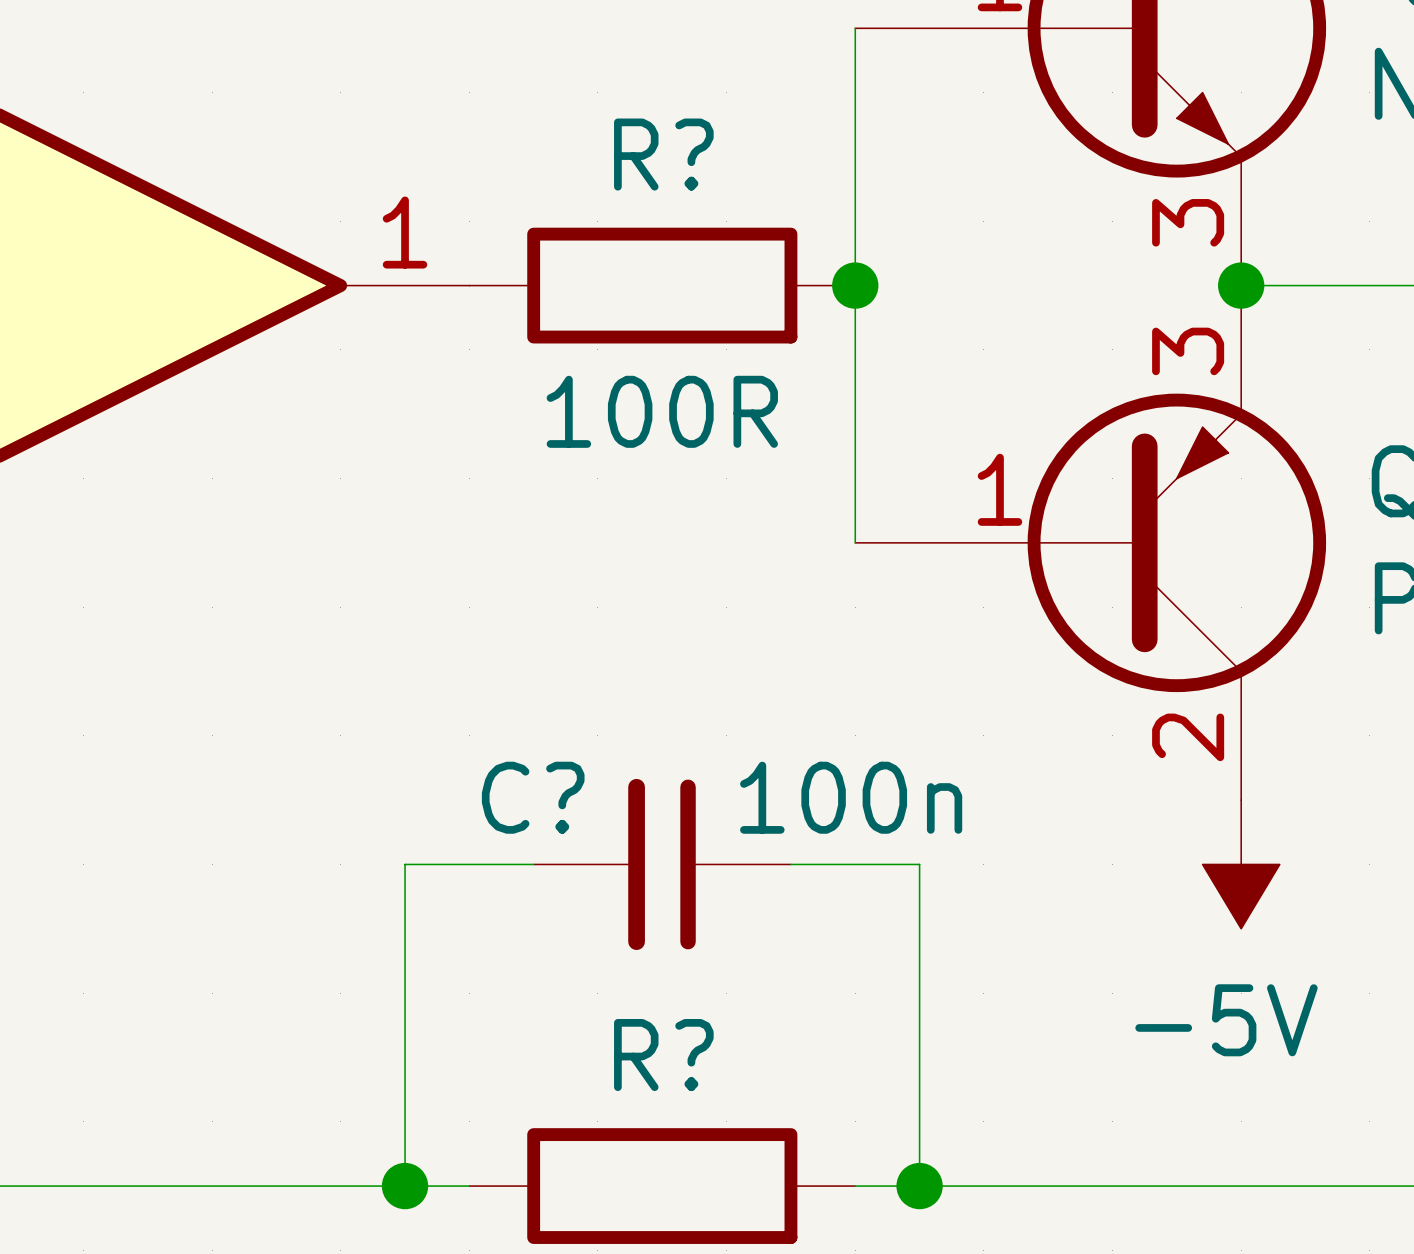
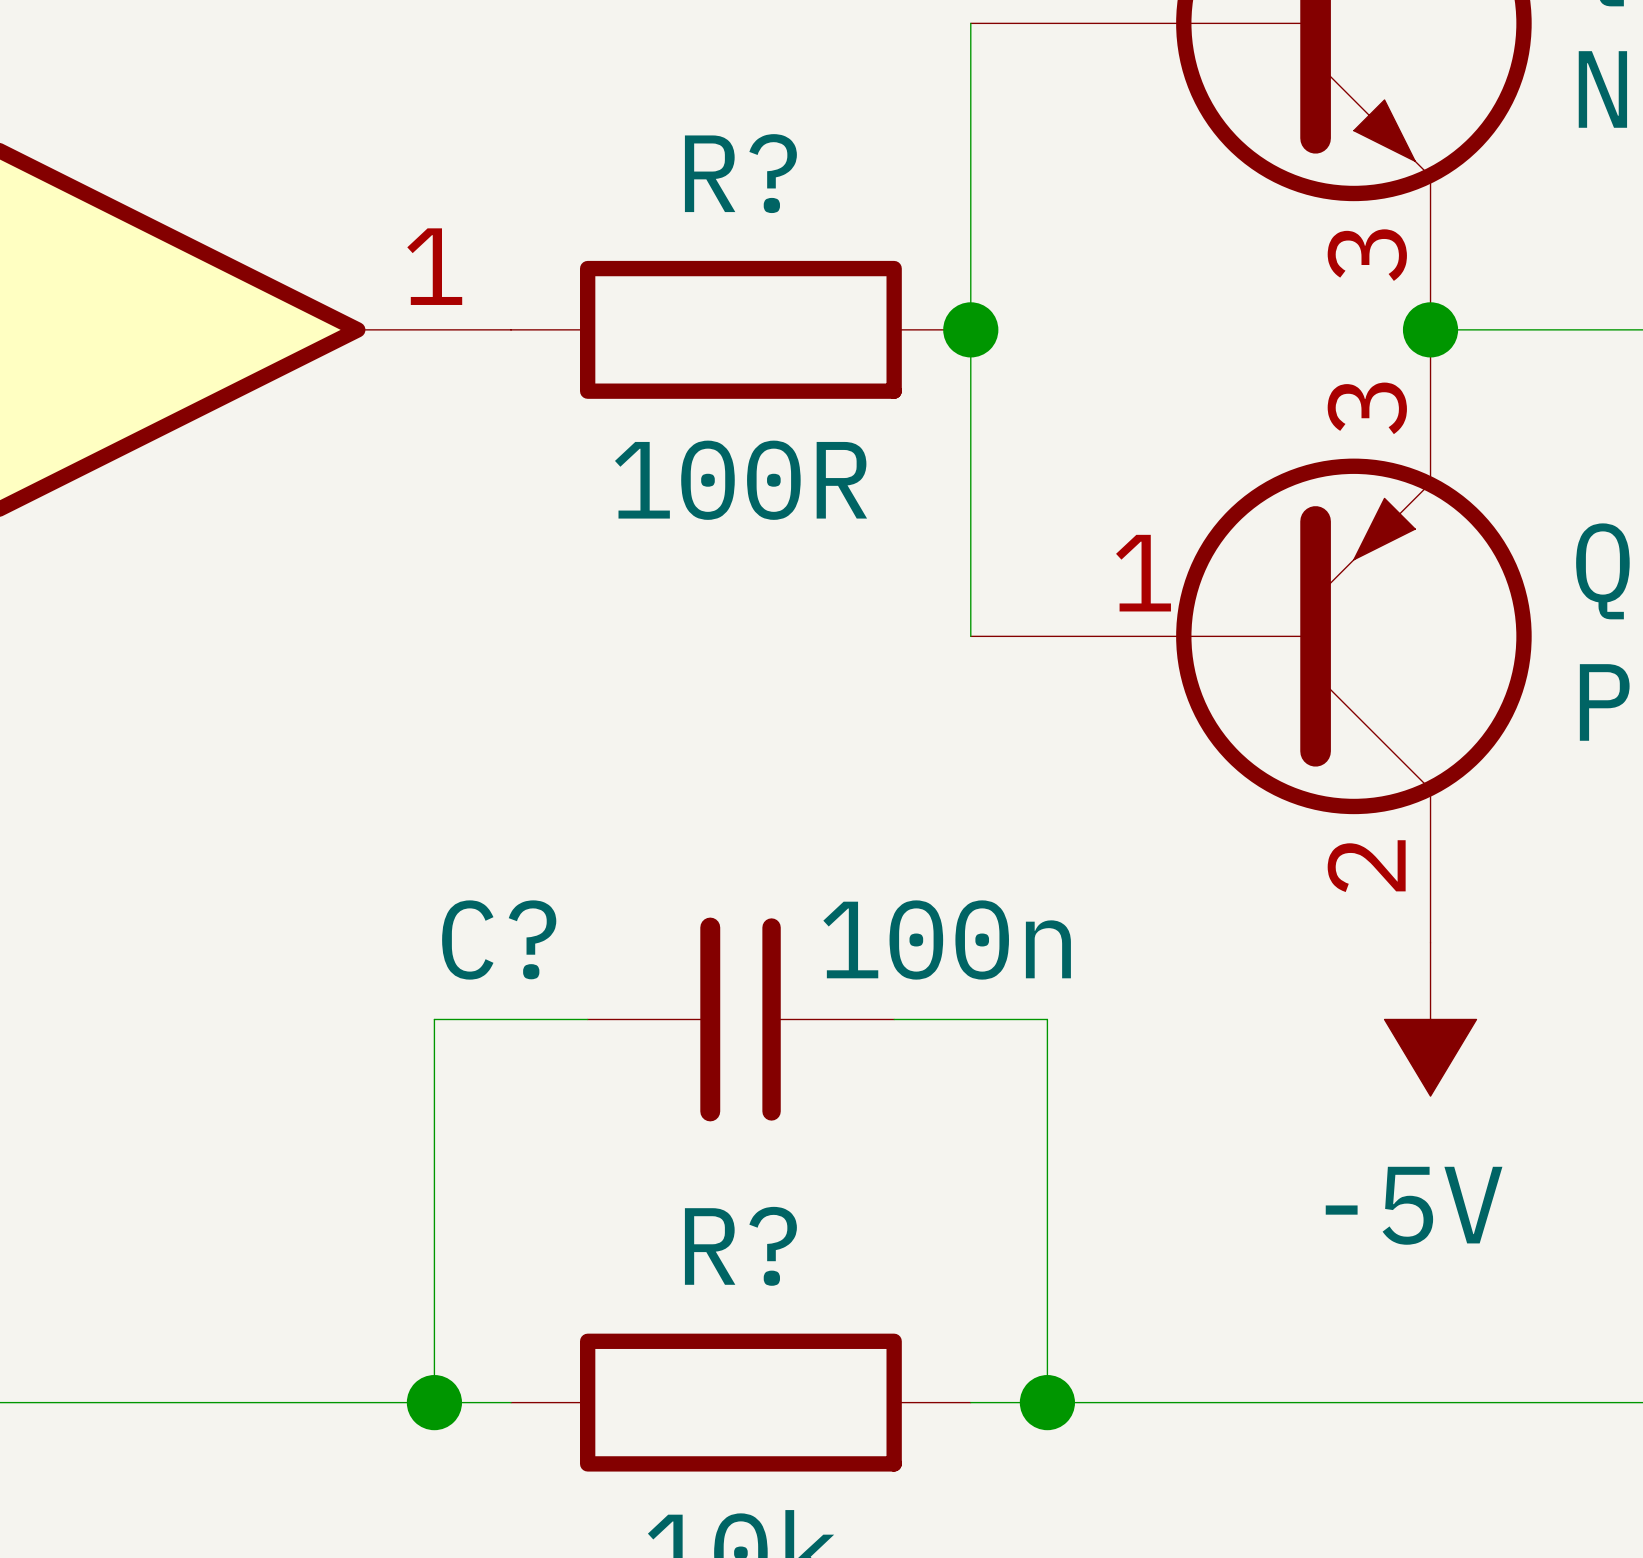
C? name position: C? (533, 797) -> C? (499, 939)

